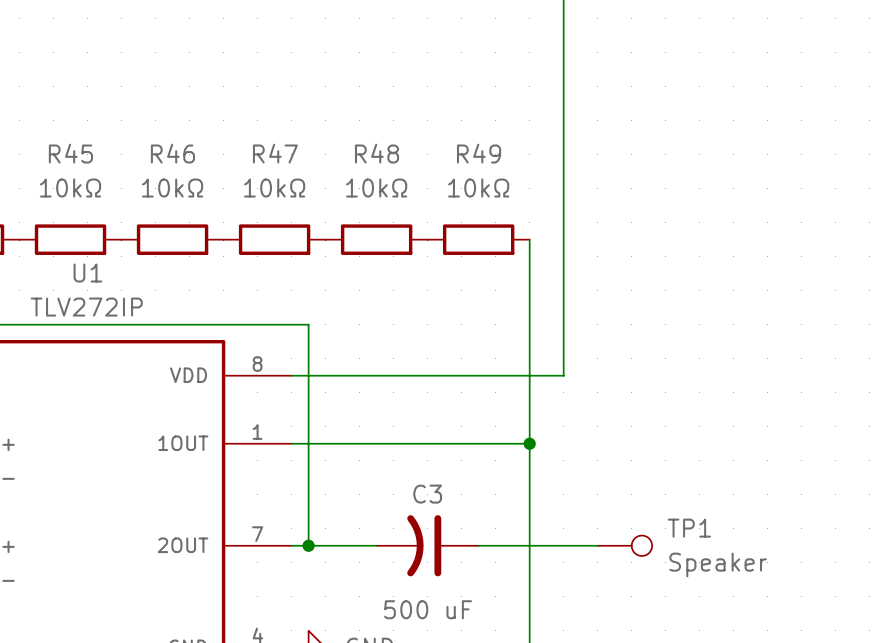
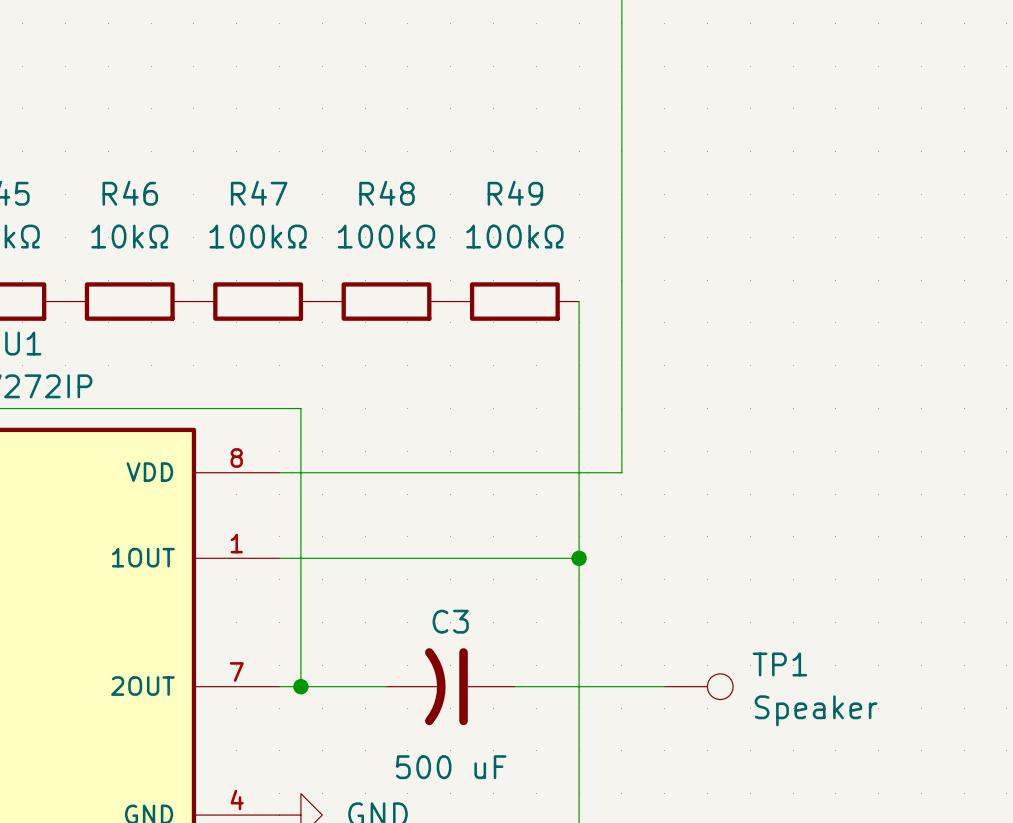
R47 value: 10kΩ (274, 188) -> 100kΩ (258, 236)
R48 value: 10kΩ (376, 188) -> 100kΩ (386, 236)
R49 value: 10kΩ (478, 188) -> 100kΩ (514, 236)

